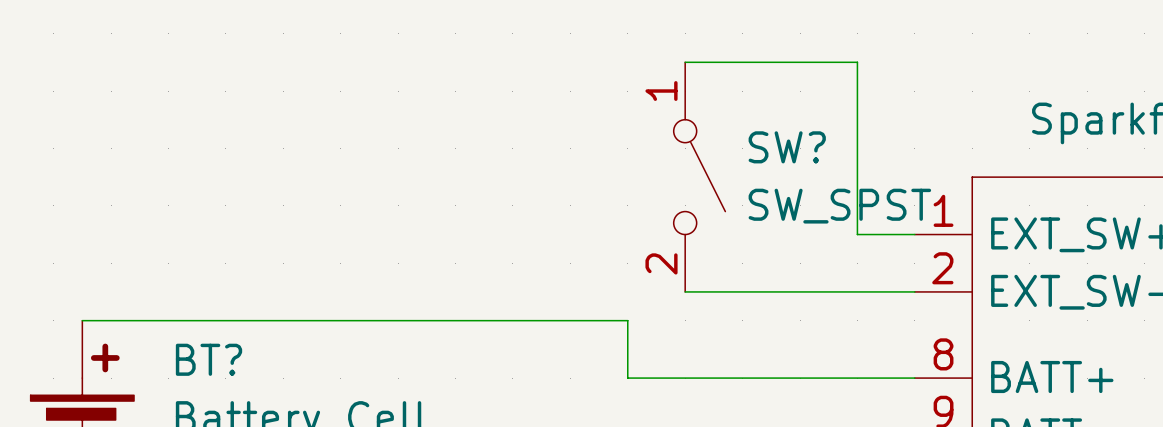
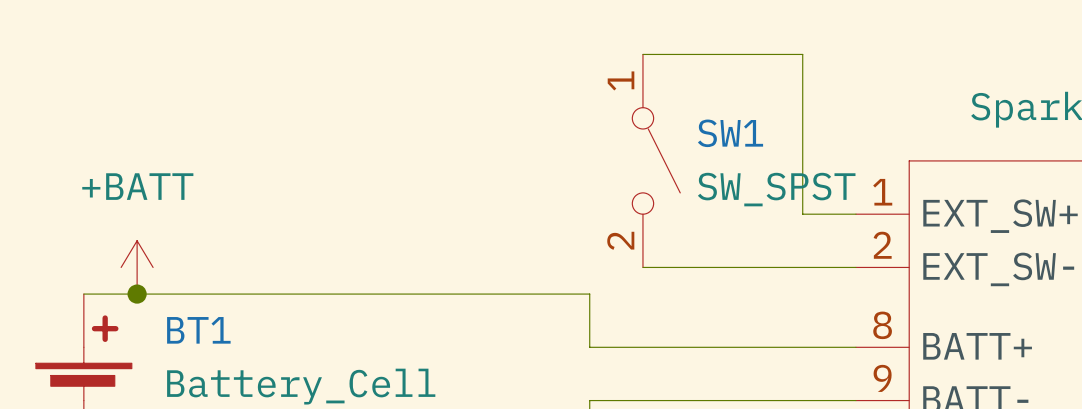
SW? name: SW? (787, 147) -> SW1 (730, 133)
power symbol: none -> +BATT (137, 267)
junction: none -> (137, 294)
BT? name: BT? (209, 359) -> BT1 (198, 330)

